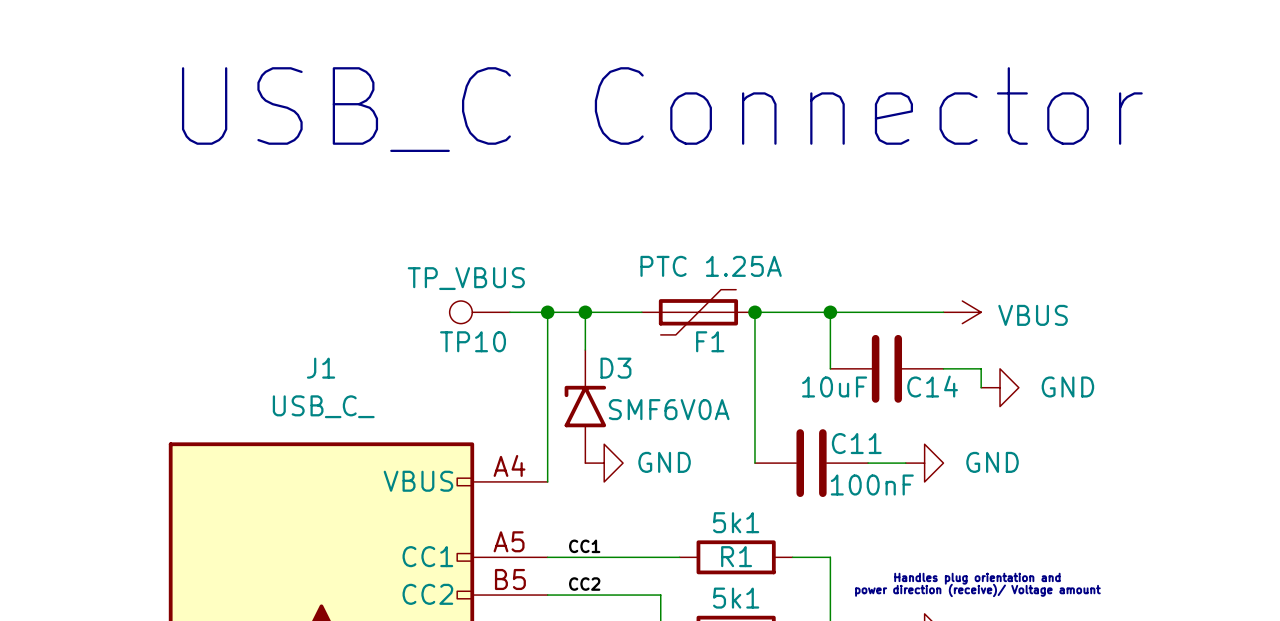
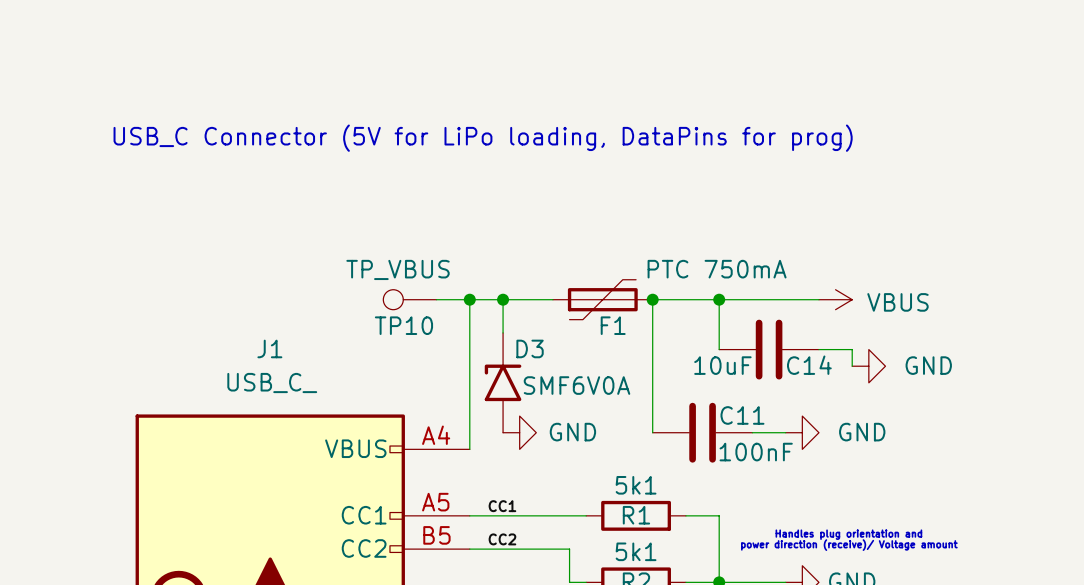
text: USB_C Connector (662, 109) -> none
text: none -> USB_C Connector (5V for LiPo loading, DataPins for prog) (483, 138)
F1 value: PTC 1.25A (711, 266) -> PTC 750mA (717, 269)

